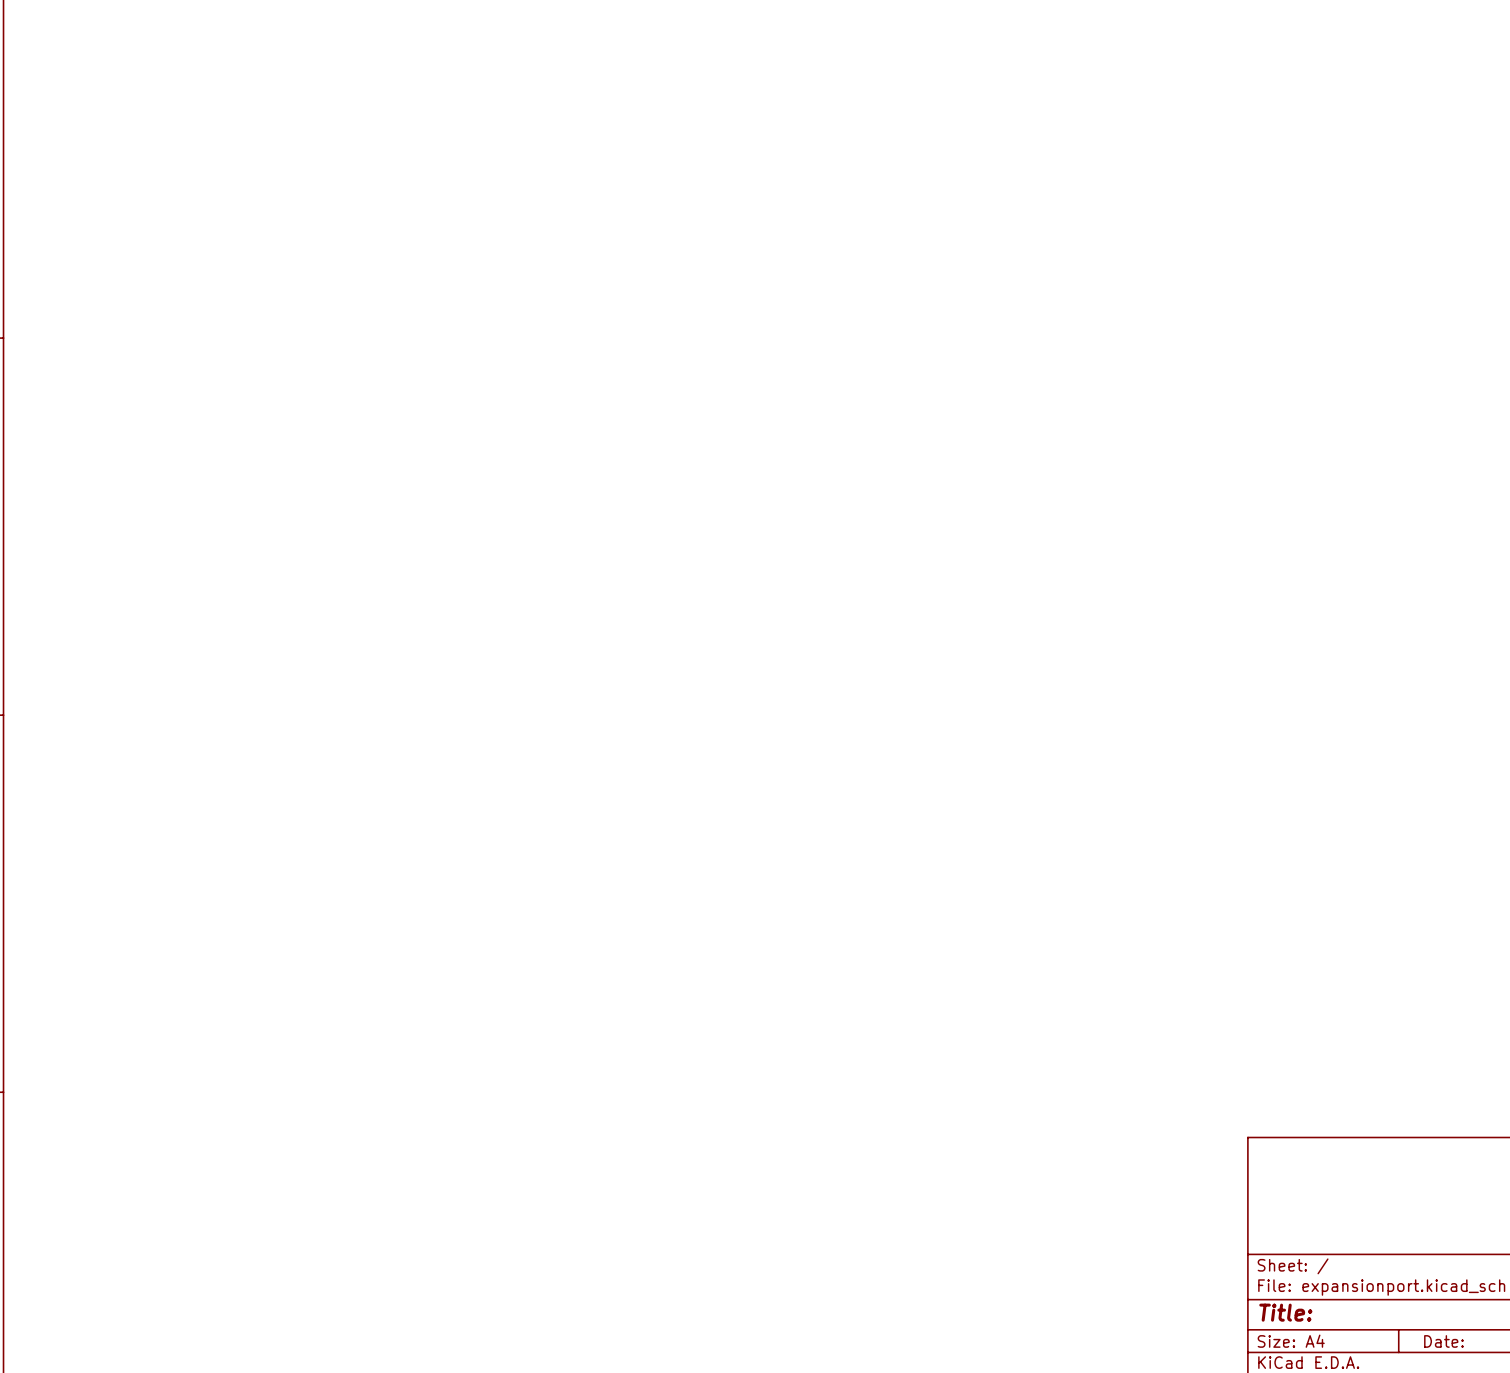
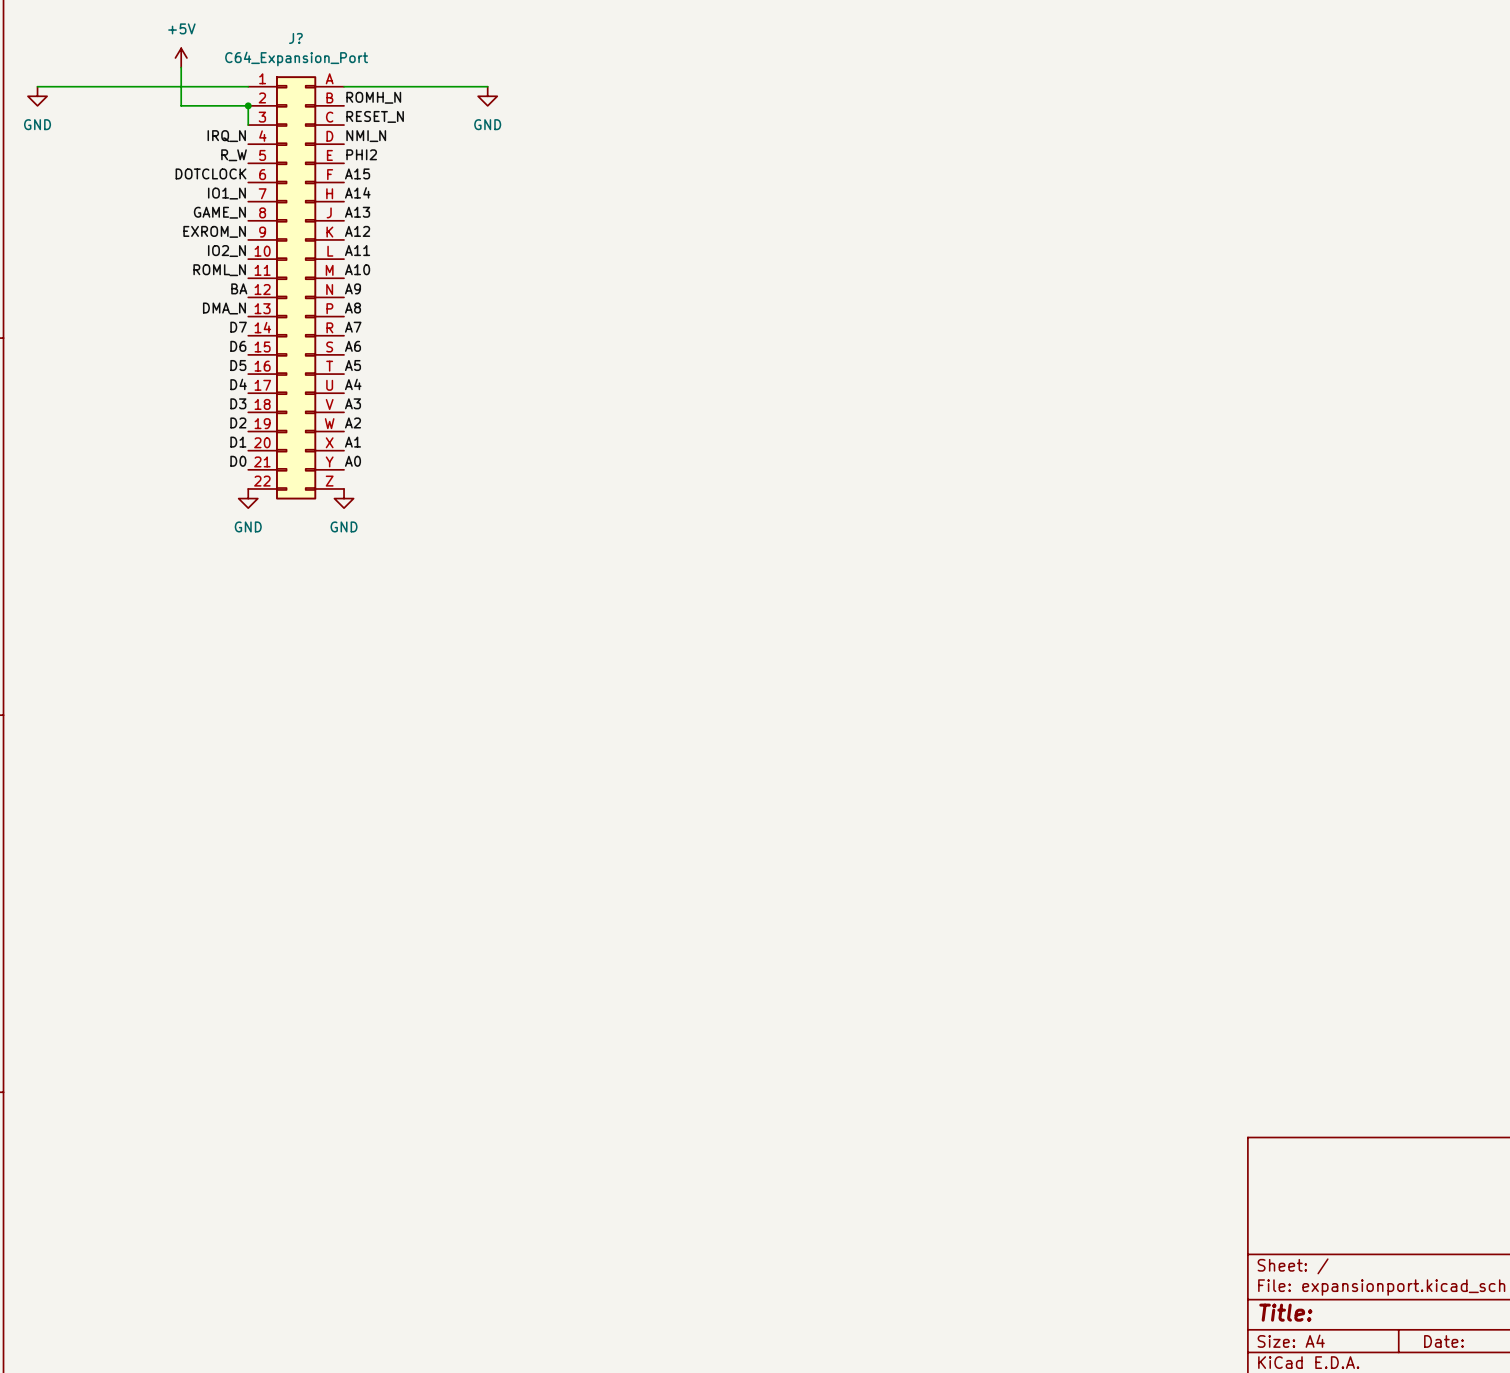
power symbol: none -> +5V (181, 57)
wire: none -> (181, 67) (181, 105) (248, 105) (248, 125)
wire: none -> (37, 86) (248, 86)
wire: none -> (344, 86) (487, 86)
power symbol: none -> GND (37, 96)
power symbol: none -> GND (487, 96)
label: none -> ROMH_N (373, 97)
junction: none -> (248, 105)
label: none -> RESET_N (375, 116)
label: none -> IRQ_N (226, 136)
label: none -> NMI_N (366, 136)
label: none -> PHI2 (361, 154)
label: none -> R_W (234, 155)
label: none -> DOTCLOCK (211, 173)
label: none -> A15 (357, 173)
label: none -> A14 (357, 192)
label: none -> IO1_N (226, 193)
label: none -> GAME_N (219, 212)
label: none -> A13 (357, 212)
label: none -> EXROM_N (214, 231)
label: none -> A12 (357, 231)
label: none -> A11 (357, 250)
label: none -> IO2_N (226, 251)
label: none -> A10 (357, 269)
label: none -> ROML_N (219, 270)
J?: none -> C64_Expansion_Port (296, 287)
label: none -> BA (239, 288)
label: none -> A9 (352, 288)
label: none -> DMA_N (224, 308)
label: none -> A8 (352, 308)
label: none -> D7 (238, 327)
label: none -> A7 (353, 327)
label: none -> D6 (238, 346)
label: none -> A6 (352, 346)
label: none -> D5 (238, 365)
label: none -> A5 (352, 365)
label: none -> D4 (238, 384)
label: none -> A4 (353, 384)
label: none -> D3 (238, 403)
label: none -> A3 (352, 403)
label: none -> D2 (238, 422)
label: none -> A2 (352, 422)
label: none -> D1 (238, 442)
label: none -> A1 (352, 442)
label: none -> D0 (238, 461)
label: none -> A0 (352, 461)
power symbol: none -> GND (248, 498)
power symbol: none -> GND (344, 498)

